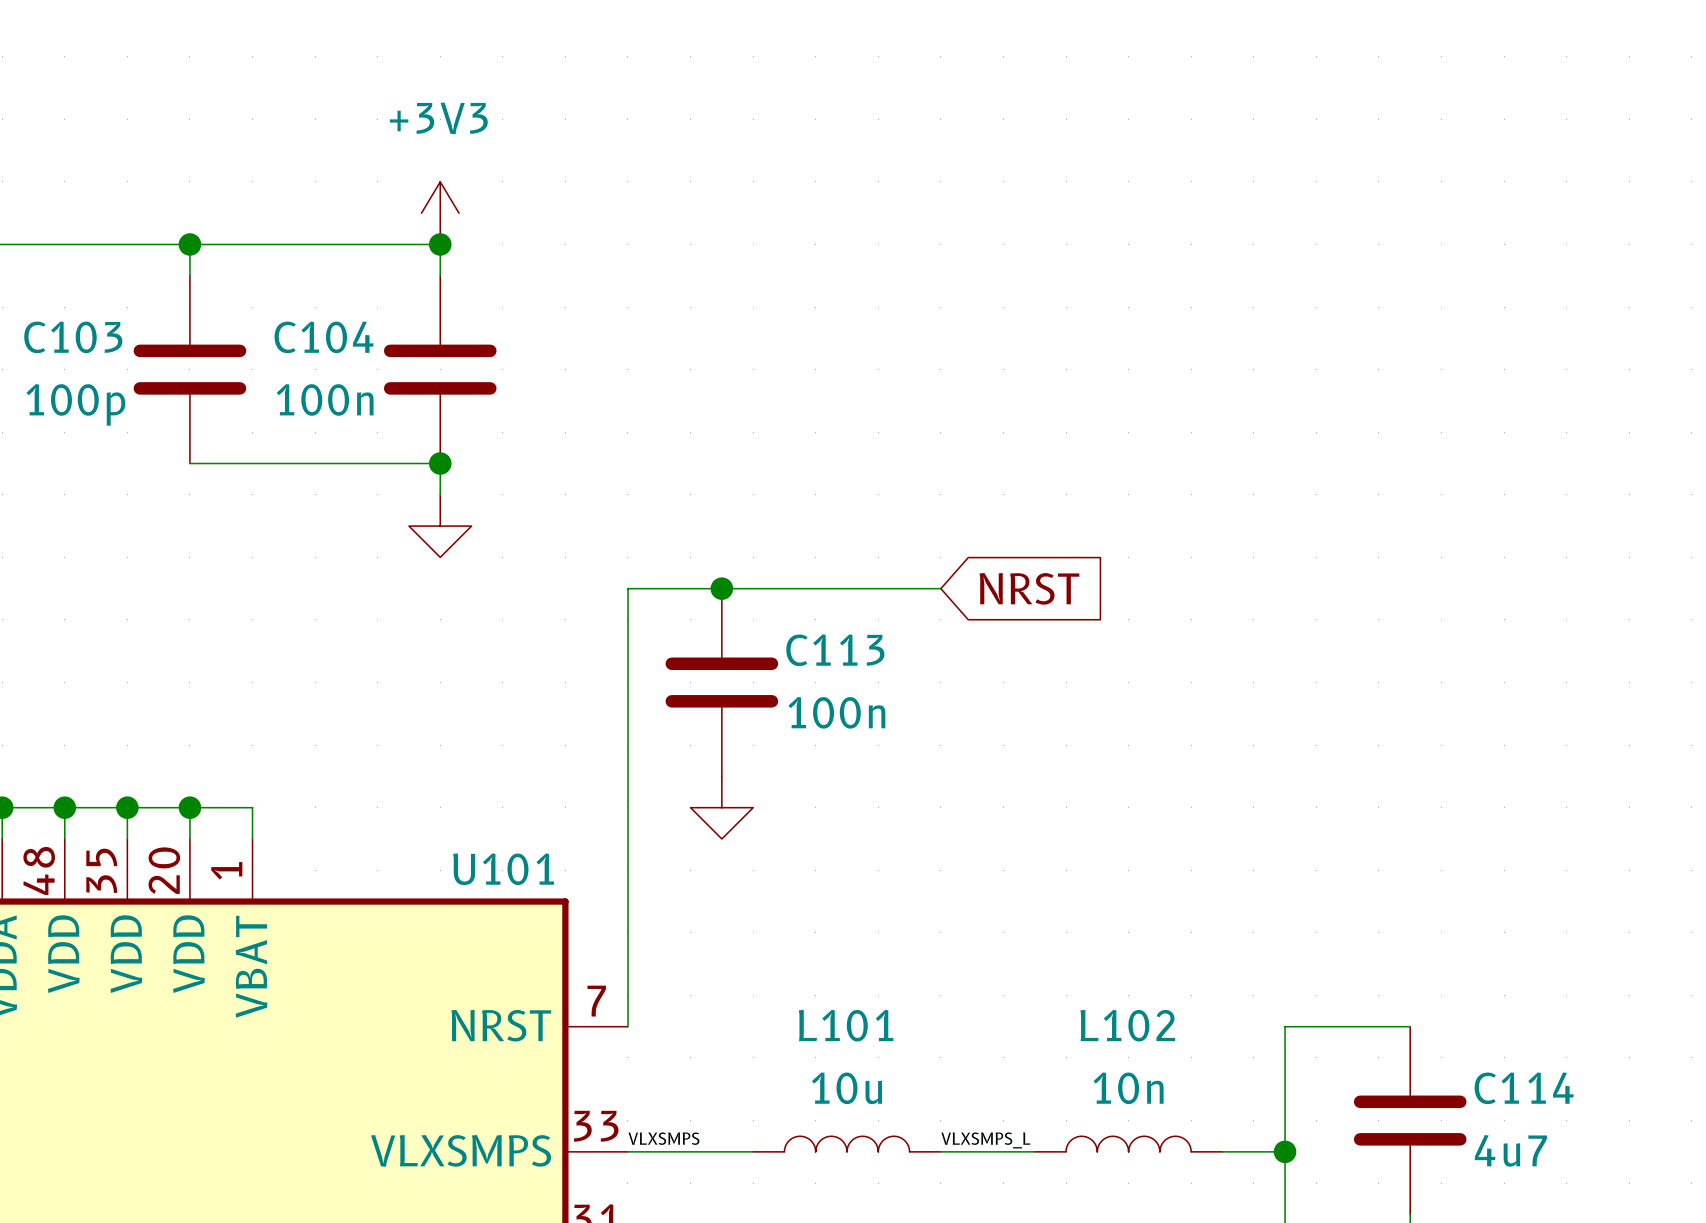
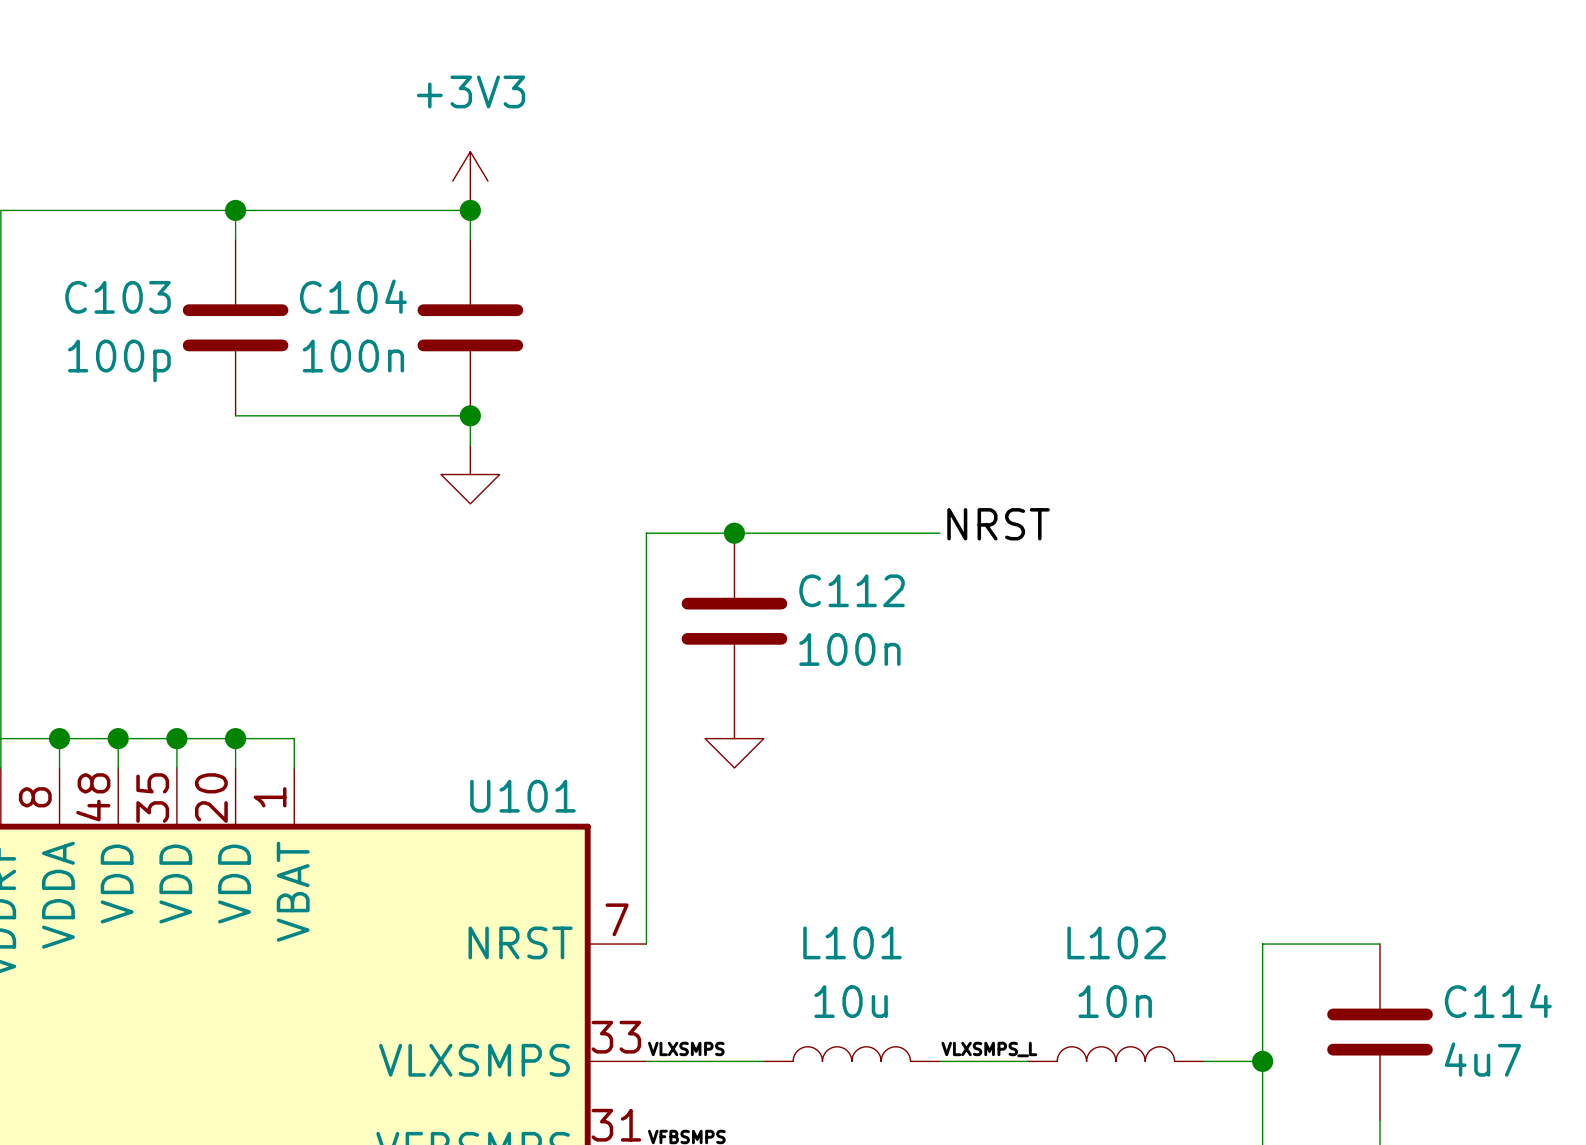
label: none -> NRST (998, 524)
global label: NRST (1029, 588) -> none
C113 name: C113 (835, 650) -> C112 (852, 590)

